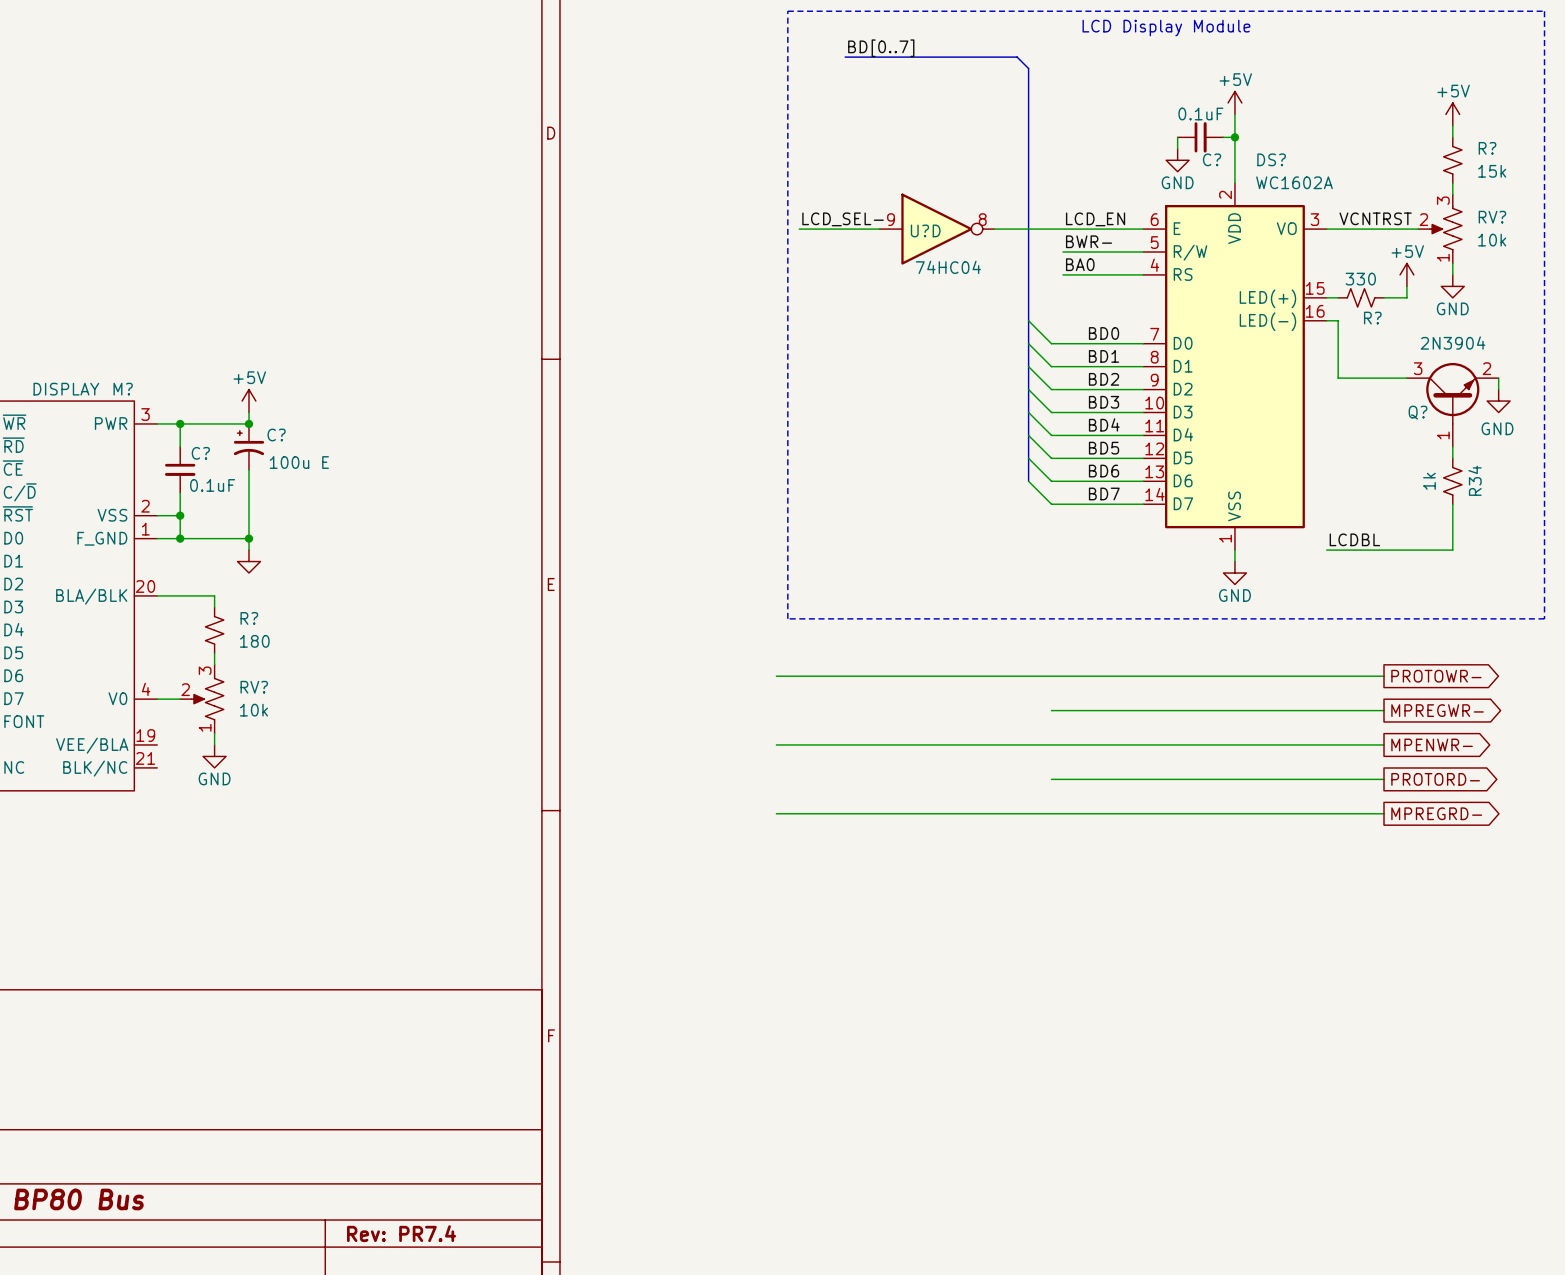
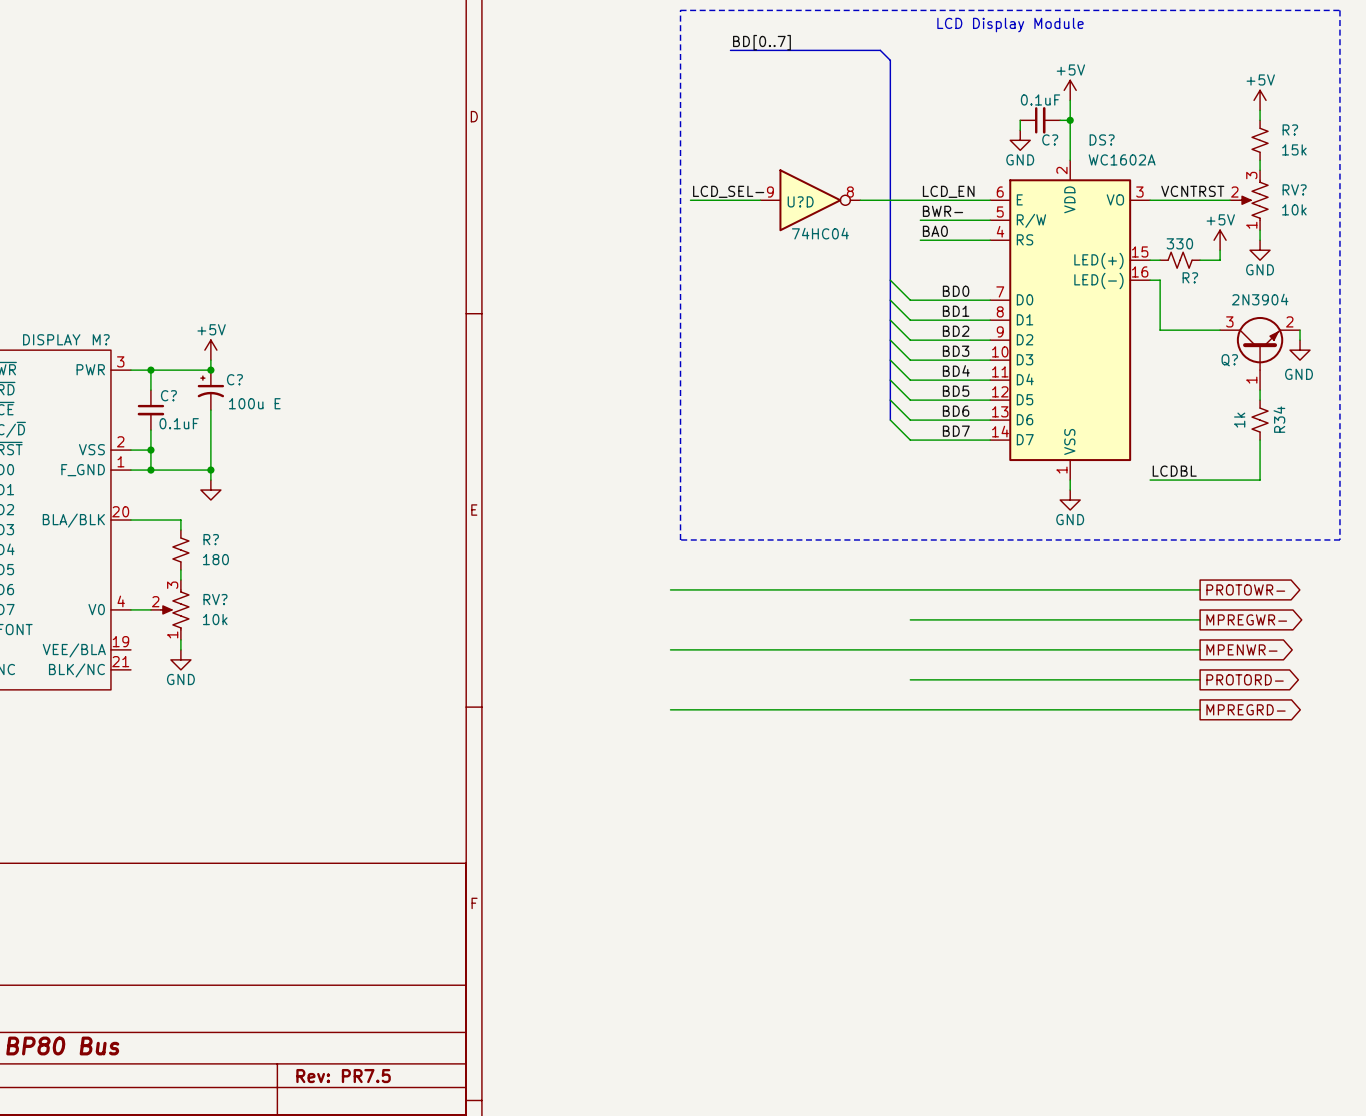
title block: Rev: PR7.4 (401, 1233) -> Rev: PR7.5 (343, 1076)

